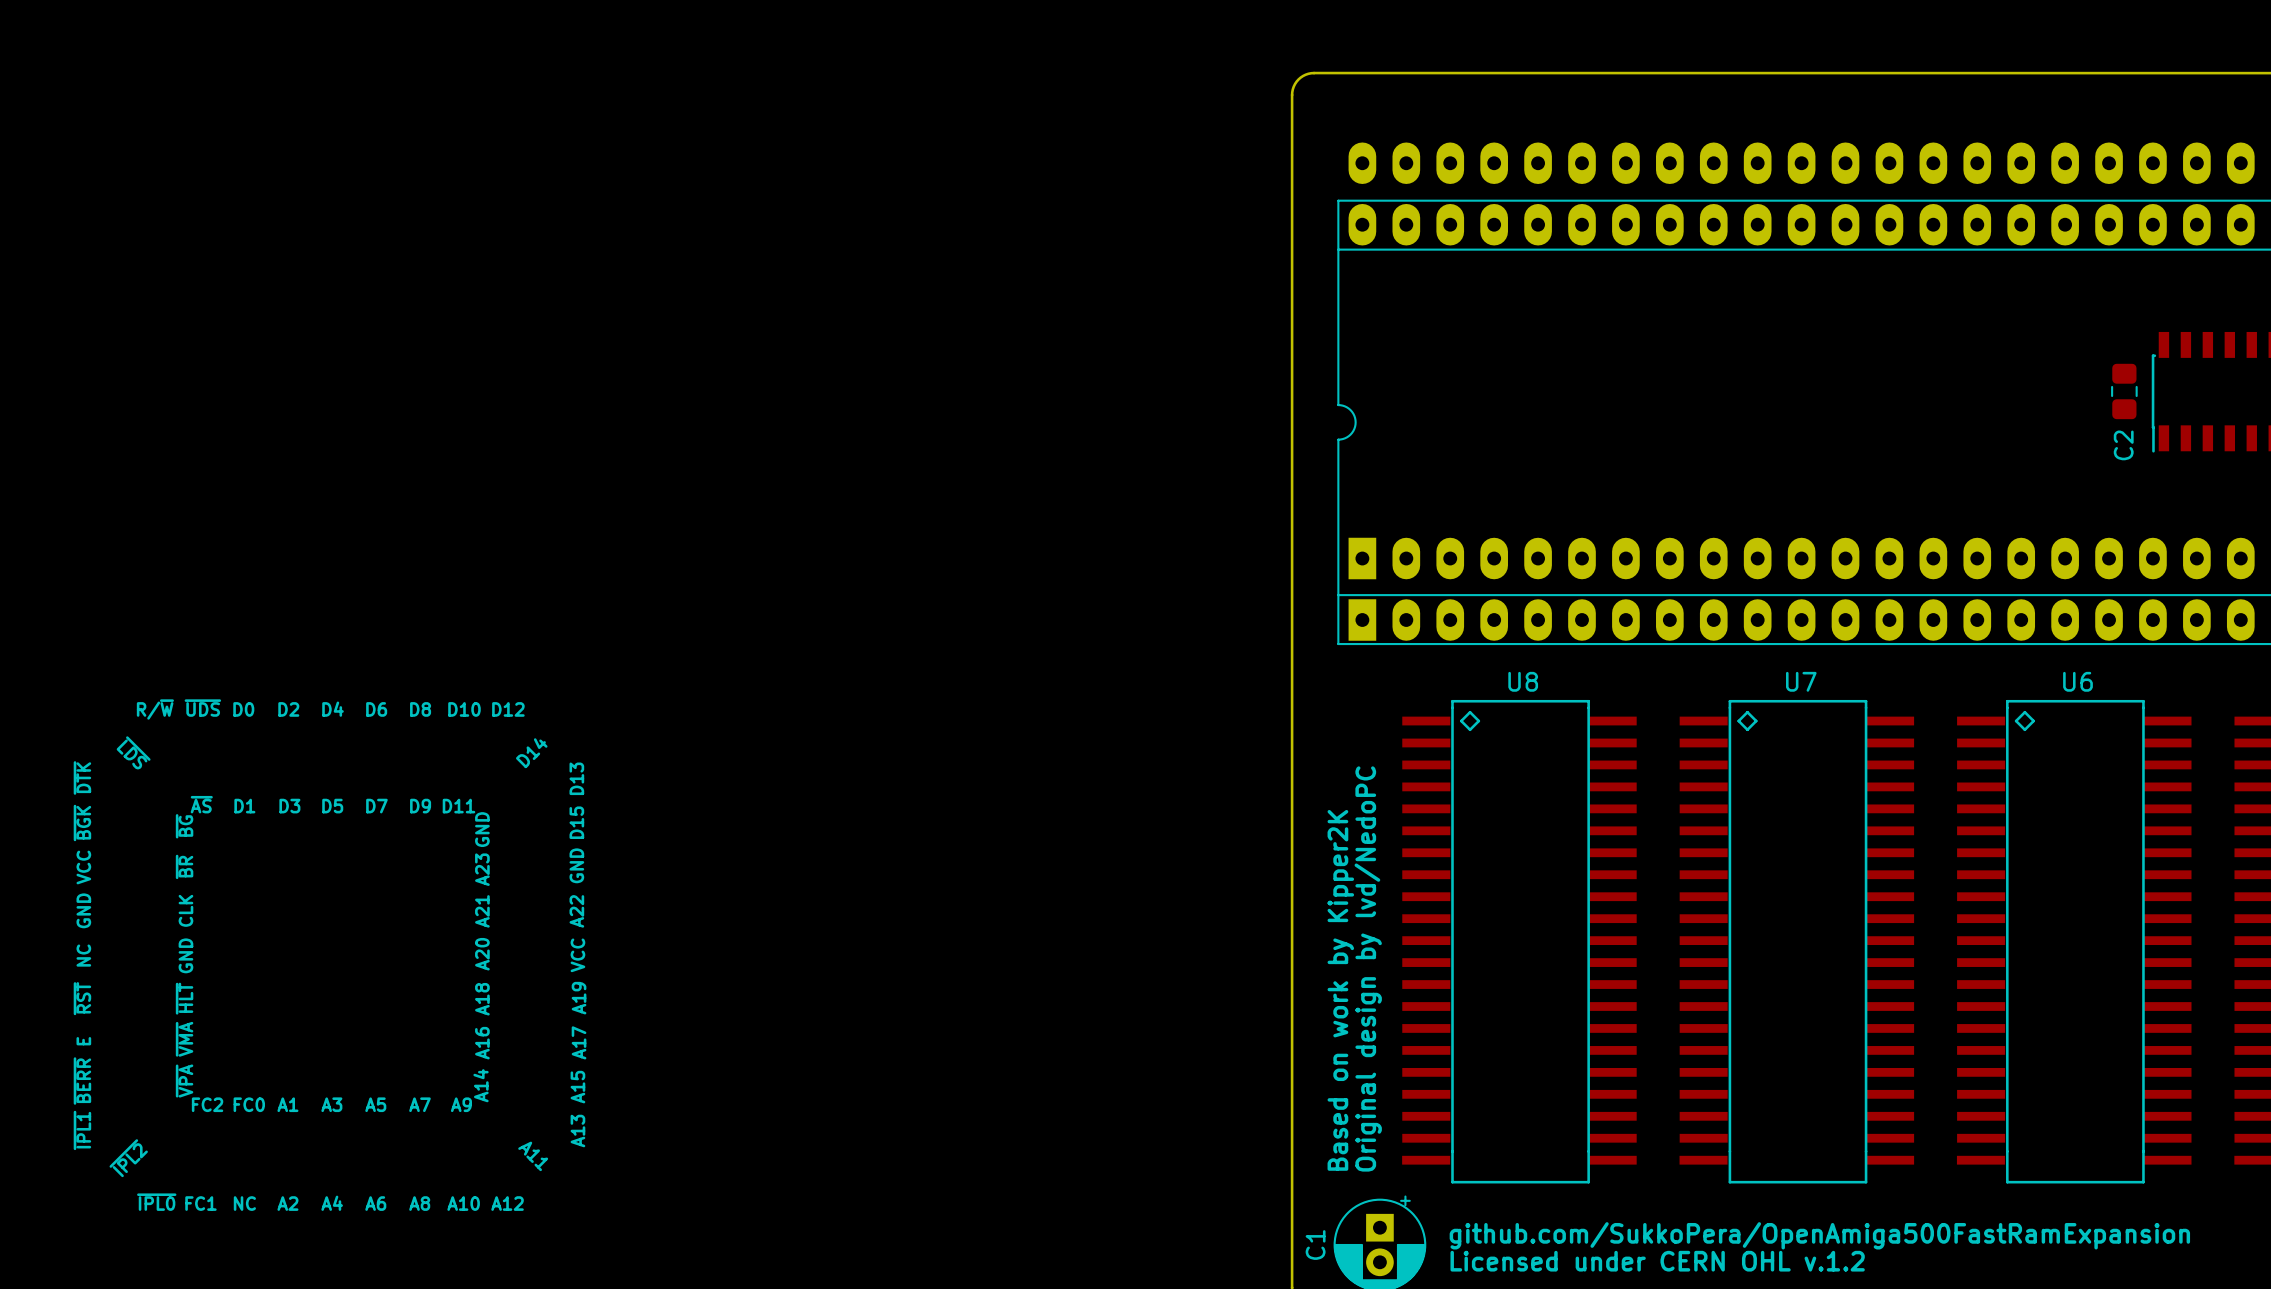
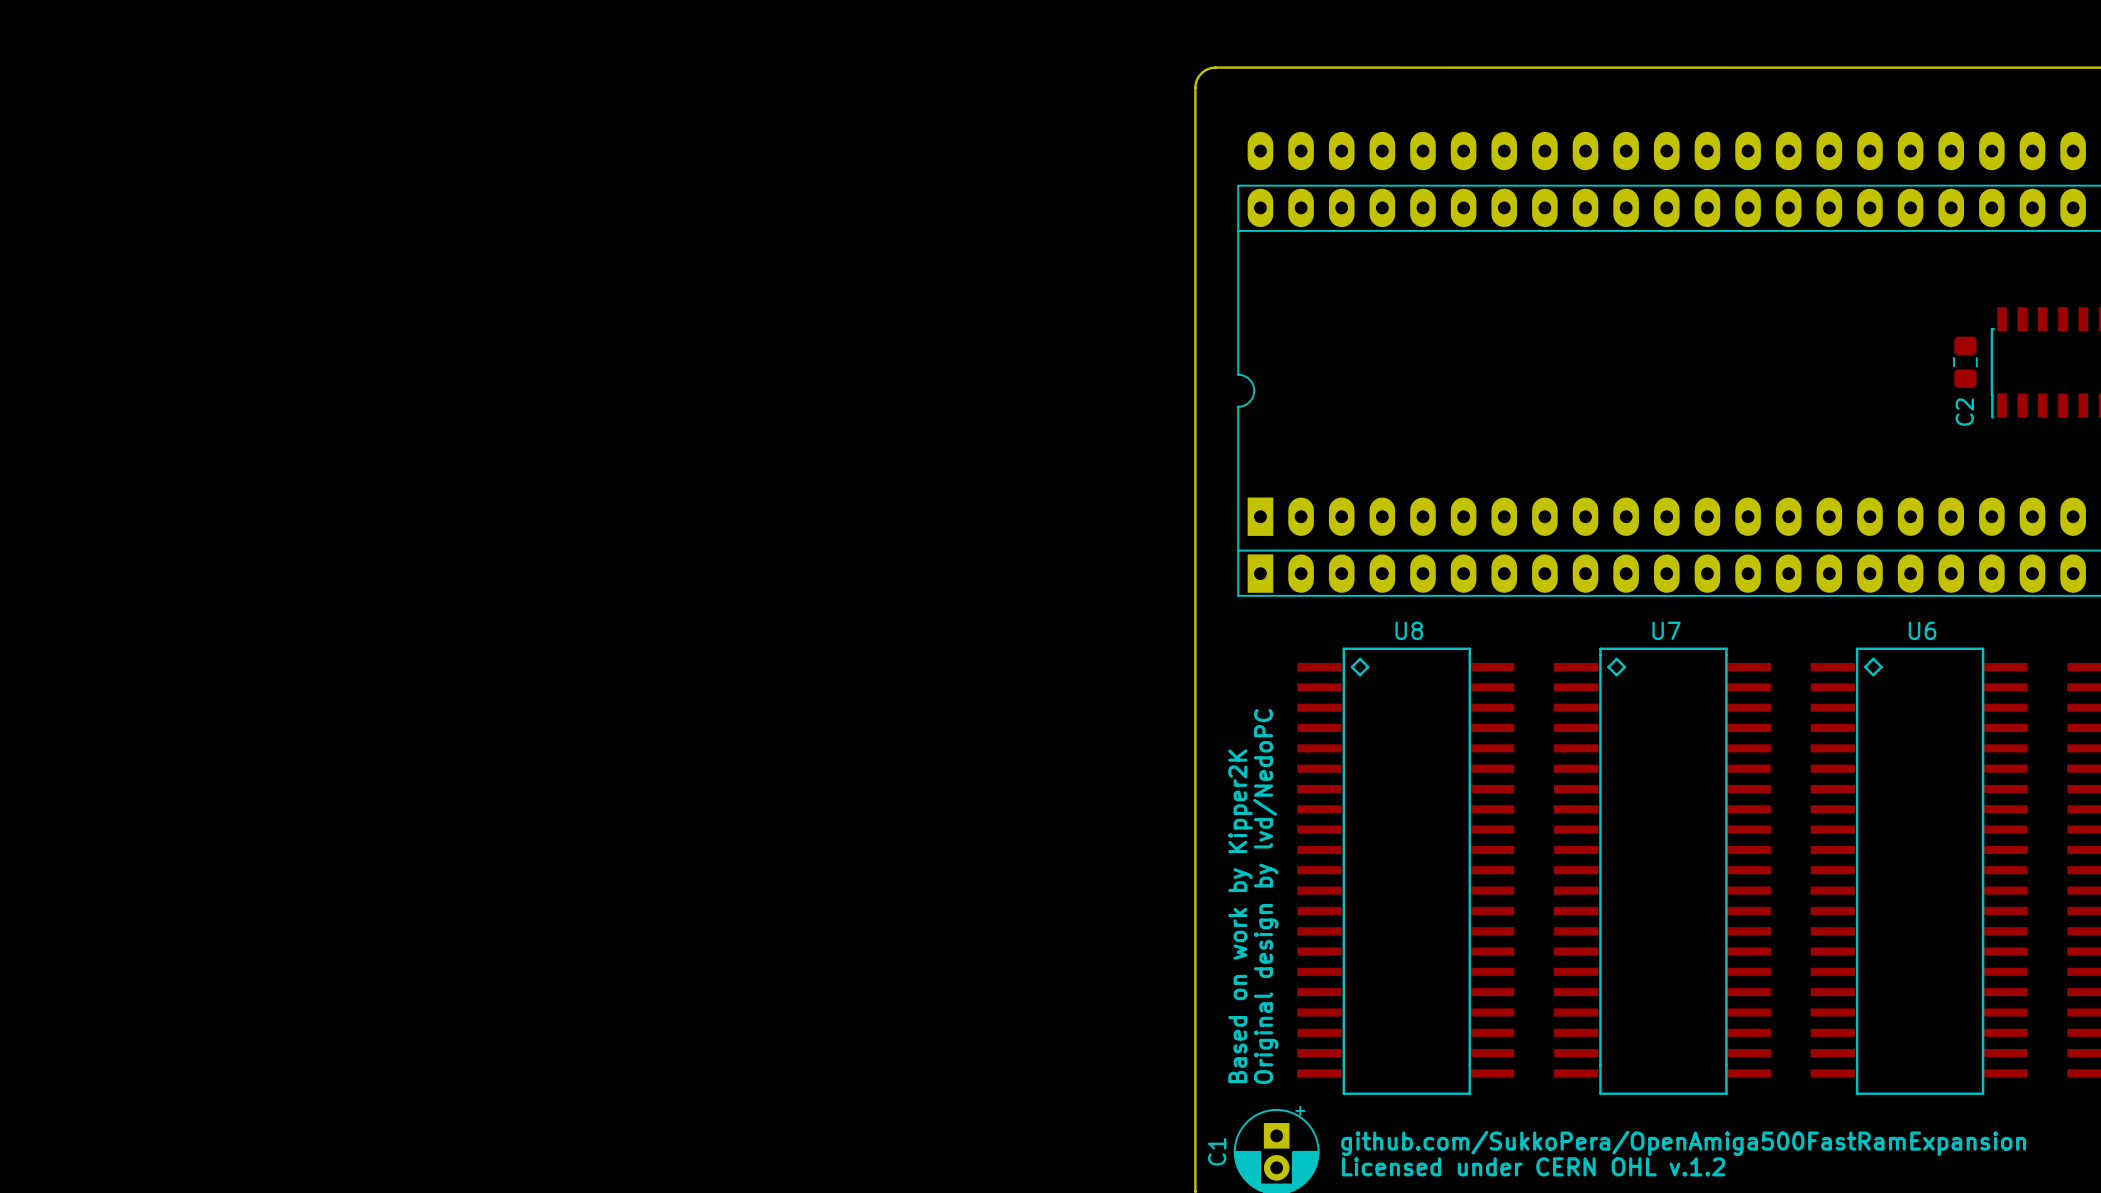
text: ~{UDS} (202, 708) -> none
text: R/~{W} (155, 709) -> none
text: D0 (243, 709) -> none
text: D2 (288, 709) -> none
text: D4 (333, 709) -> none
text: D6 (376, 709) -> none
text: D8 (420, 709) -> none
text: D10 (464, 709) -> none
text: D12 (508, 709) -> none
text: ~{LDS} (133, 752) -> none
text: D14 (531, 753) -> none
text: ~{DTK} (82, 777) -> none
text: D13 (576, 778) -> none
text: ~{AS} (201, 804) -> none
text: D1 (244, 806) -> none
text: D3 (289, 806) -> none
text: D5 (332, 806) -> none
text: D7 (376, 806) -> none
text: D9 (420, 806) -> none
text: D11 (458, 806) -> none
text: ~{BGK} (82, 822) -> none
text: D15 (576, 822) -> none
text: ~{BG} (184, 826) -> none
text: GND (482, 829) -> none
text: GND (576, 865) -> none
text: ~{BR} (184, 866) -> none
text: VCC (83, 867) -> none
text: A23 (482, 869) -> none
text: GND (83, 910) -> none
text: CLK (185, 910) -> none
text: A21 (482, 911) -> none
text: A22 (576, 911) -> none
text: A20 (482, 954) -> none
text: NC (83, 955) -> none
text: GND (185, 955) -> none
text: VCC (577, 955) -> none
text: ~{RST} (82, 998) -> none
text: ~{HLT} (184, 998) -> none
text: A19 (579, 998) -> none
text: A18 (482, 999) -> none
text: ~{VMA} (184, 1039) -> none
text: E (83, 1041) -> none
text: A17 (579, 1042) -> none
text: A16 (482, 1043) -> none
text: ~{BERR} (82, 1081) -> none
text: ~{VPA} (184, 1081) -> none
text: A14 (481, 1085) -> none
text: A15 (577, 1087) -> none
text: FC2 (207, 1104) -> none
text: FC0 (249, 1104) -> none
text: A1 (287, 1104) -> none
text: A3 (331, 1104) -> none
text: A5 (375, 1104) -> none
text: A7 (419, 1104) -> none
text: A9 (461, 1104) -> none
text: ~{IPL1} (82, 1130) -> none
text: A13 (577, 1131) -> none
text: A11 (533, 1156) -> none
text: ~{IPL2} (128, 1158) -> none
text: ~{IPL0} (156, 1202) -> none
text: FC1 (200, 1203) -> none
text: NC (244, 1203) -> none
text: A2 (287, 1203) -> none
text: A4 (332, 1203) -> none
text: A6 (375, 1203) -> none
text: A8 (419, 1203) -> none
text: A10 (463, 1203) -> none
text: A12 (507, 1203) -> none

